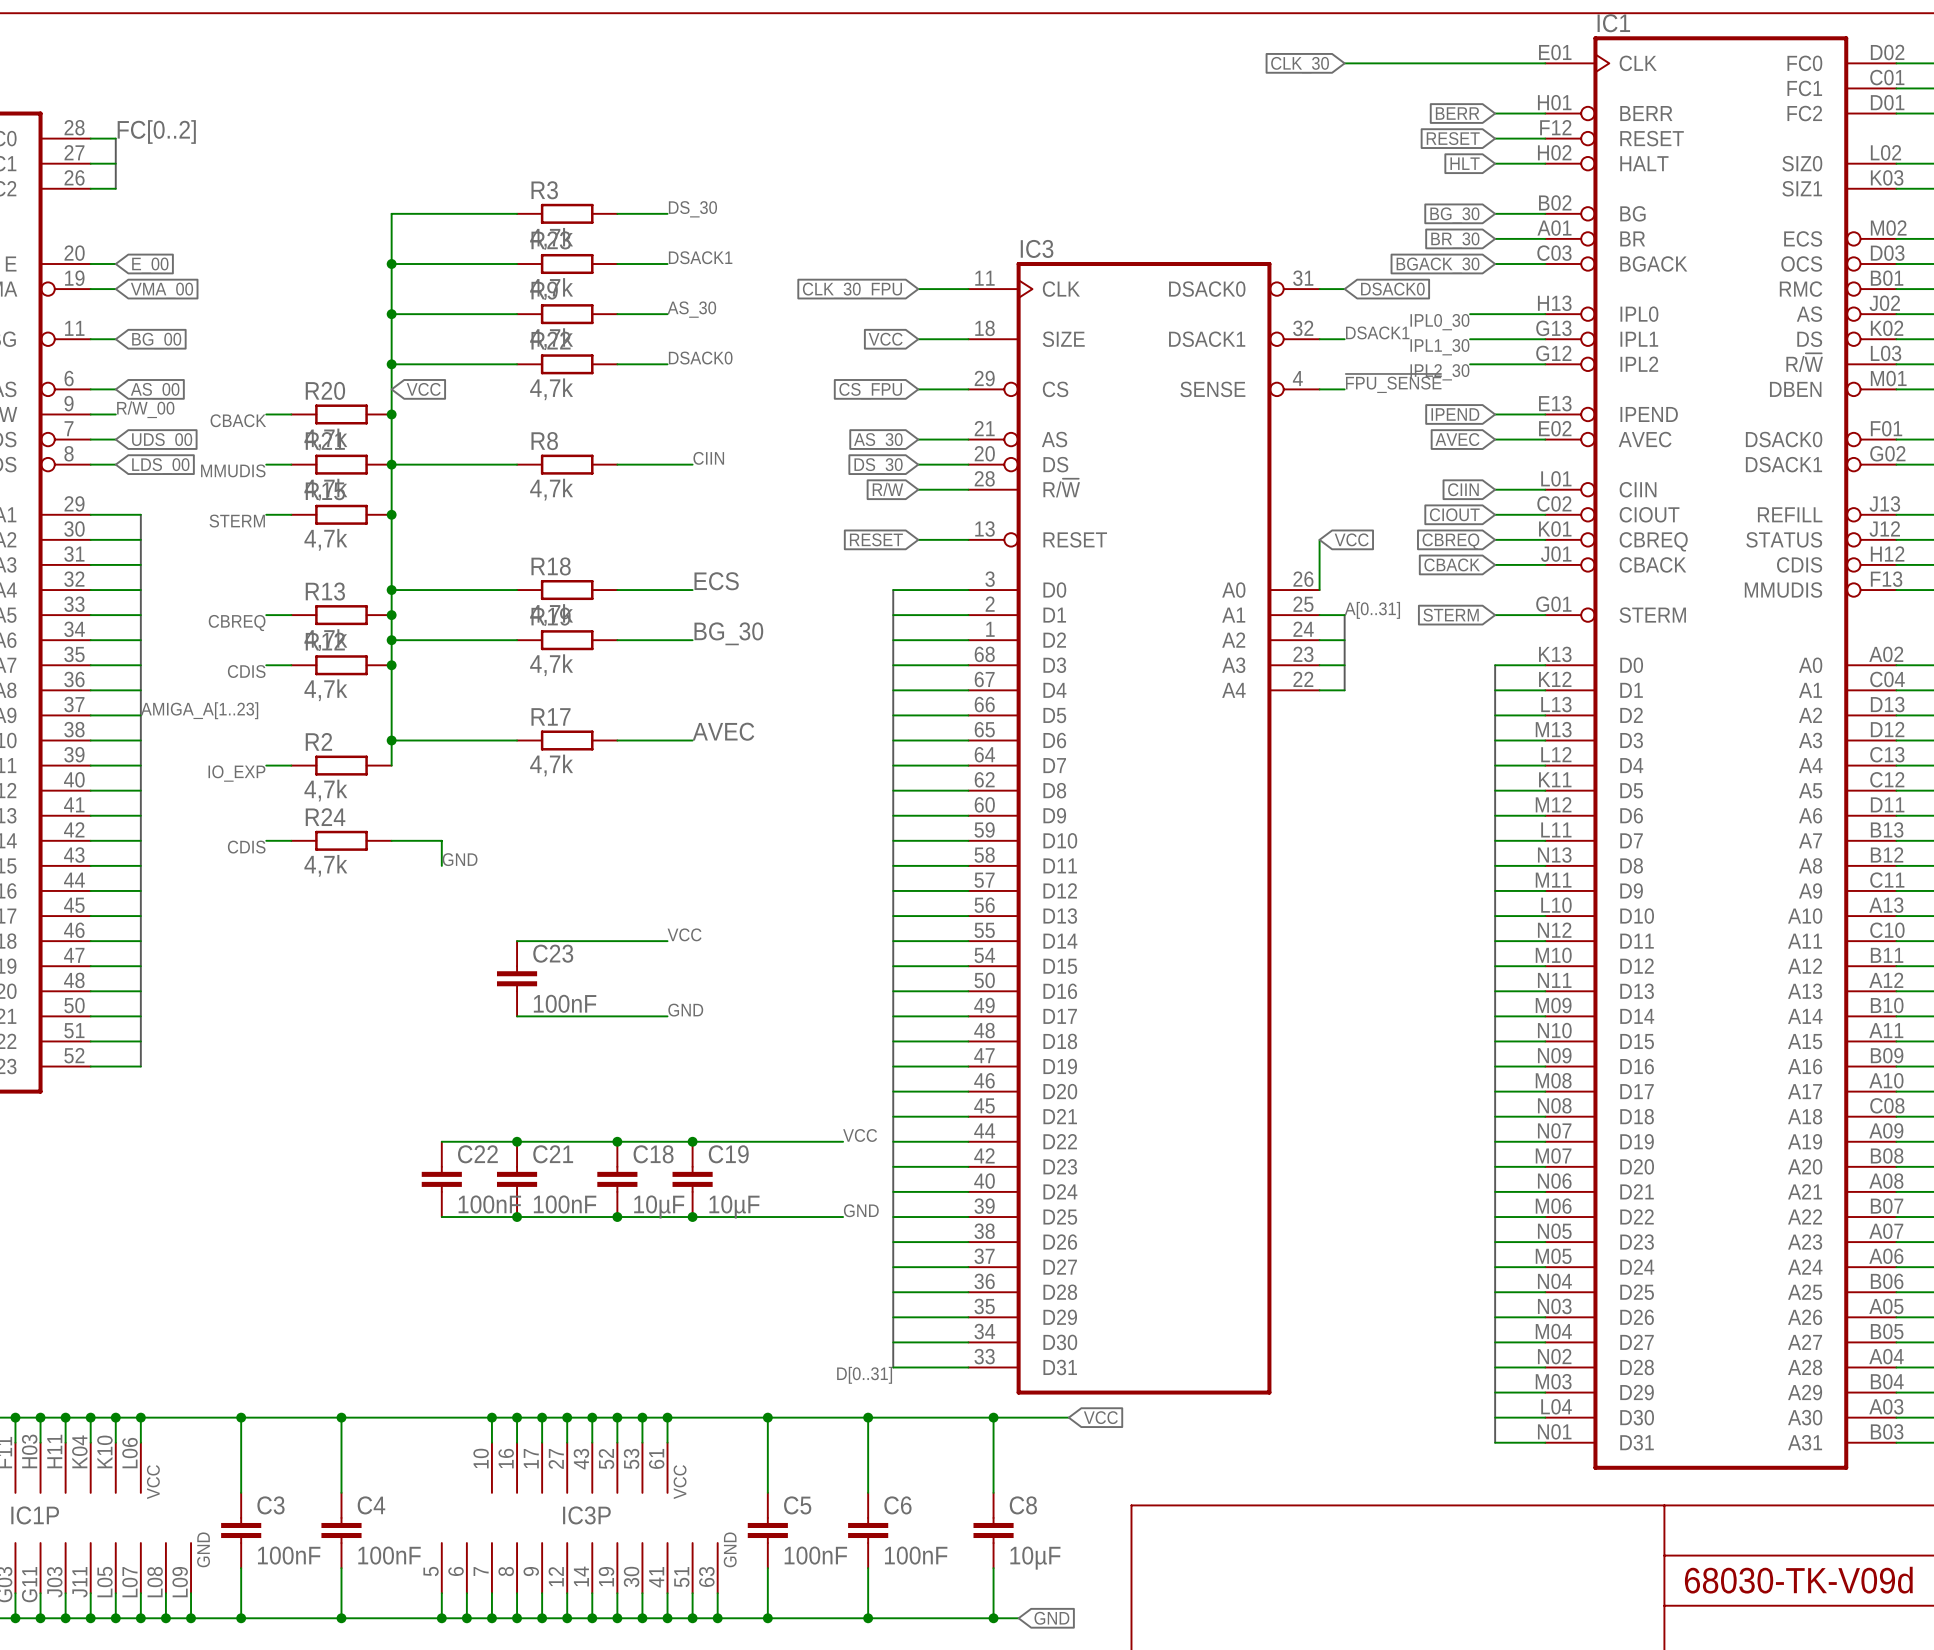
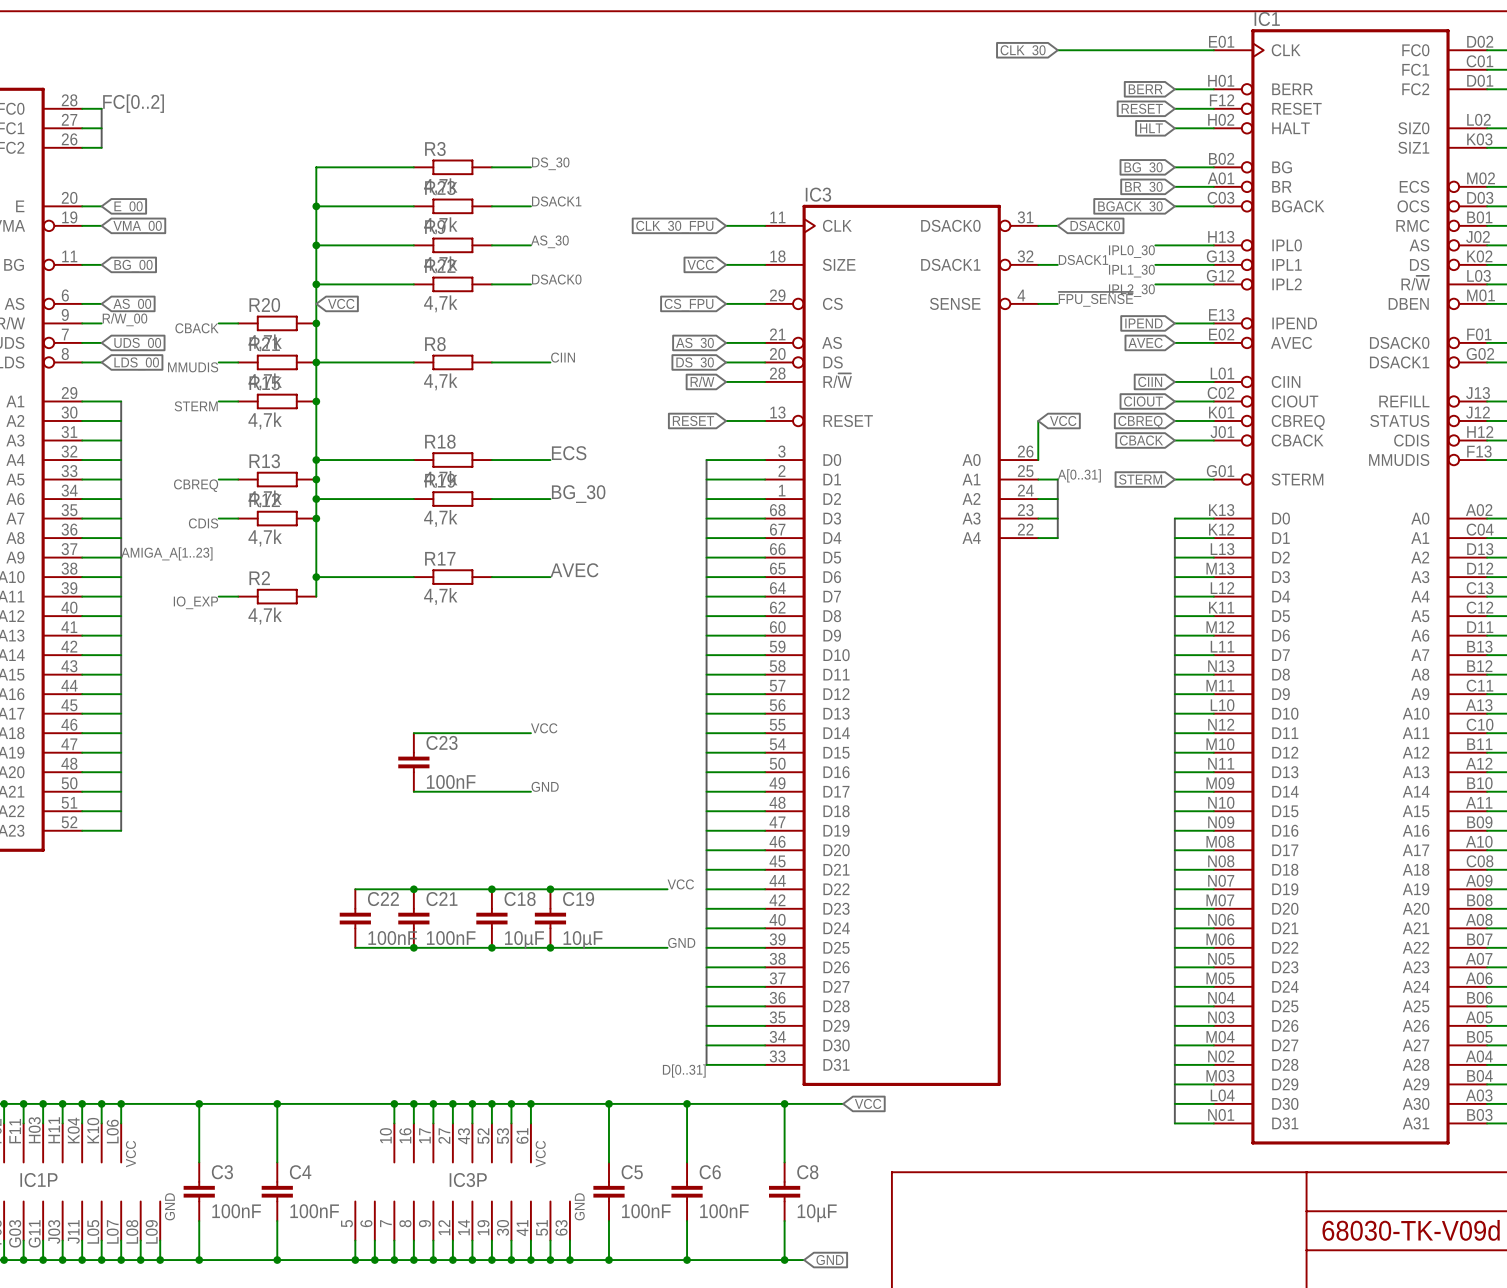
wire: (266, 840) (291, 840) -> none
R24: 4,7k (341, 840) -> none
wire: (391, 840) (441, 840) (441, 865) -> none
label: CDIS (246, 847) -> none
label: GND (460, 859) -> none

